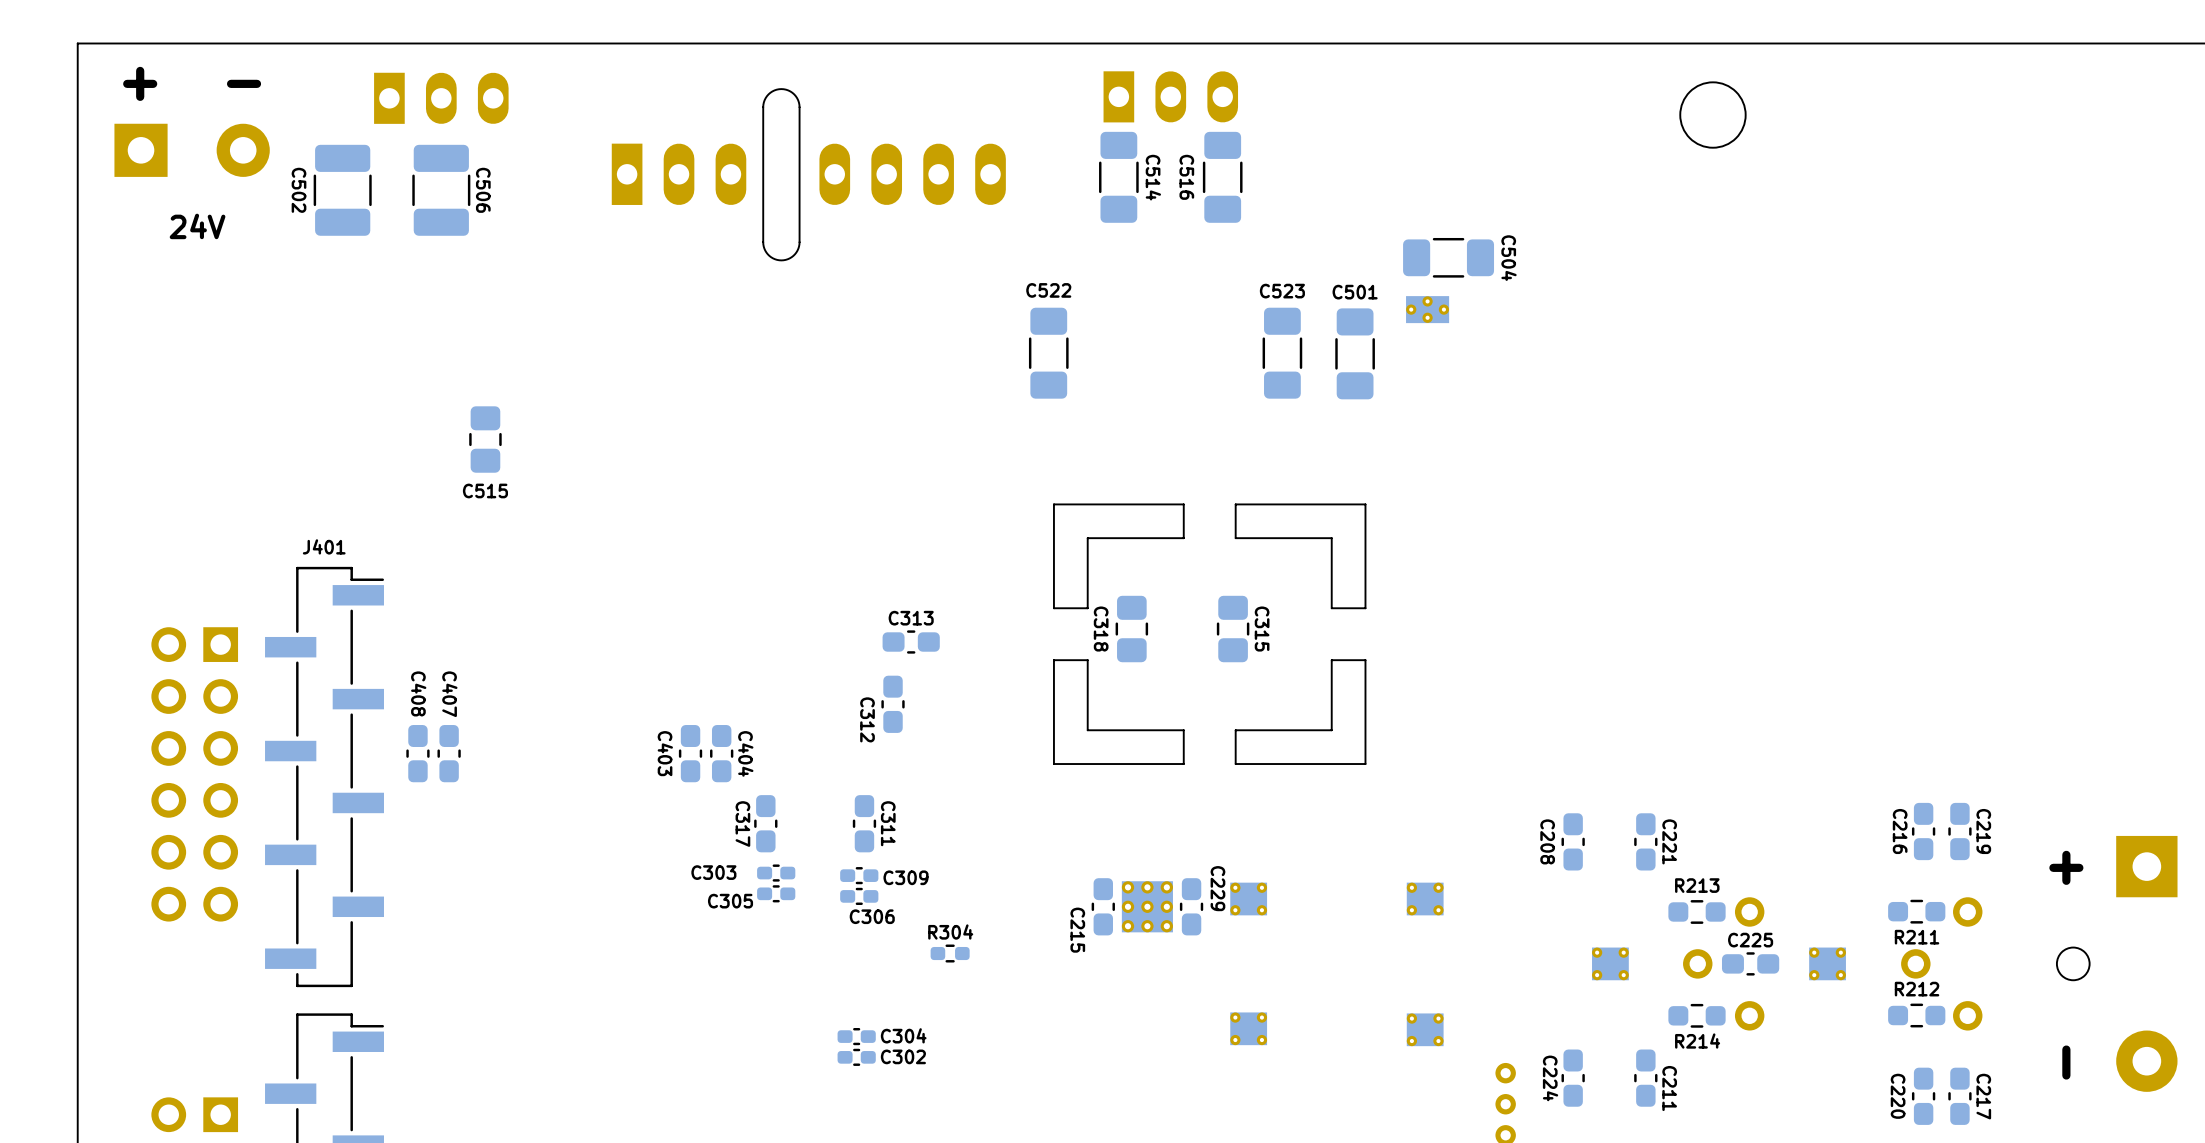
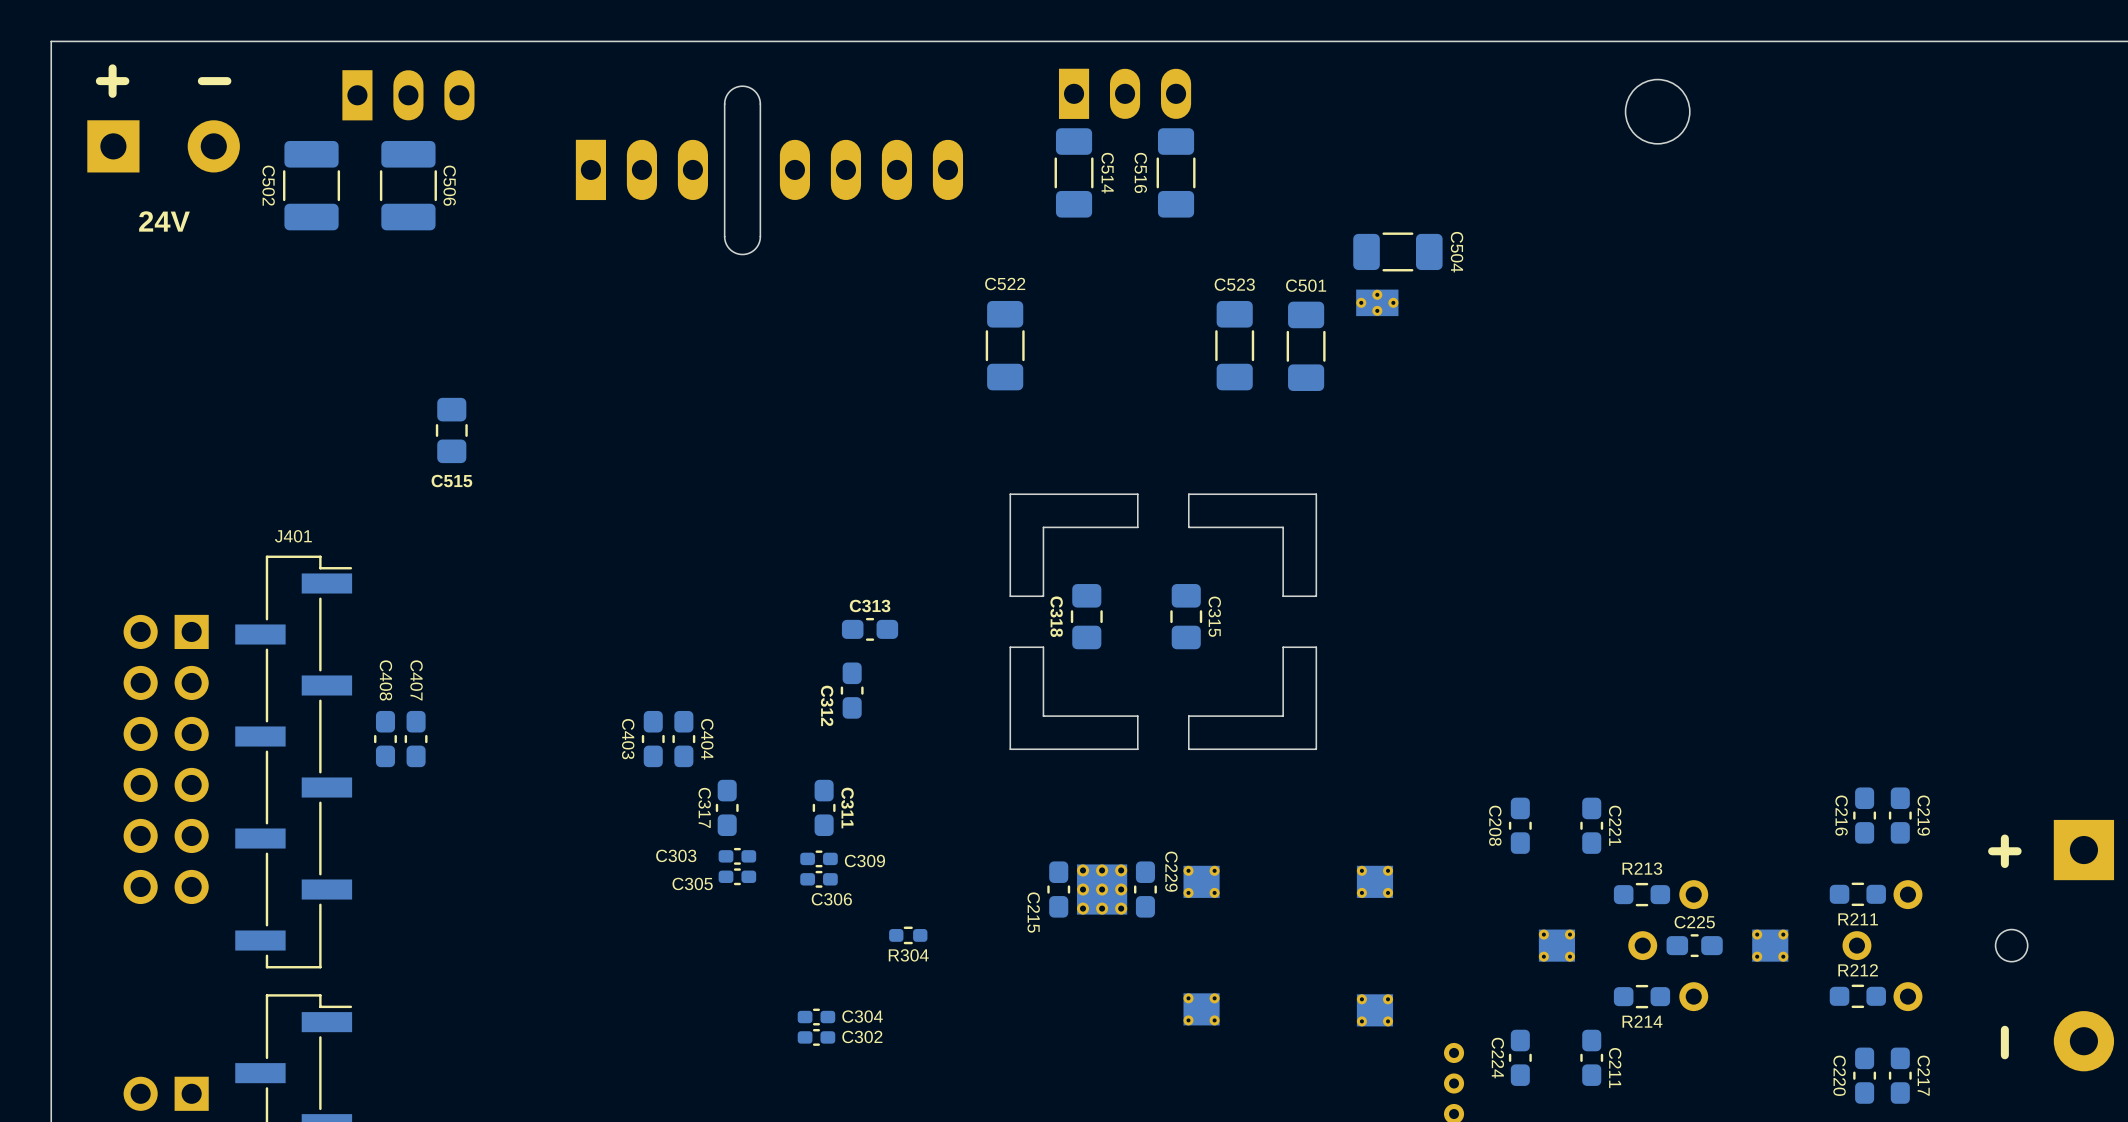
R304 name position: R304 (950, 932) -> R304 (908, 955)

